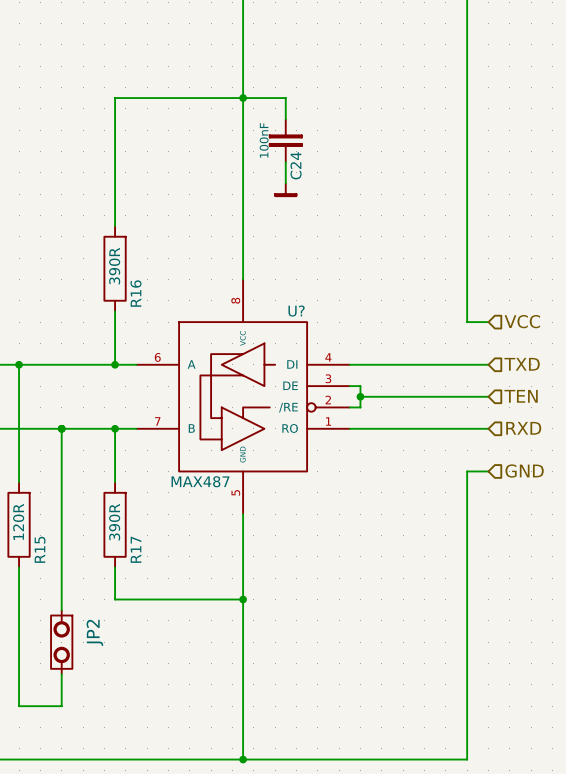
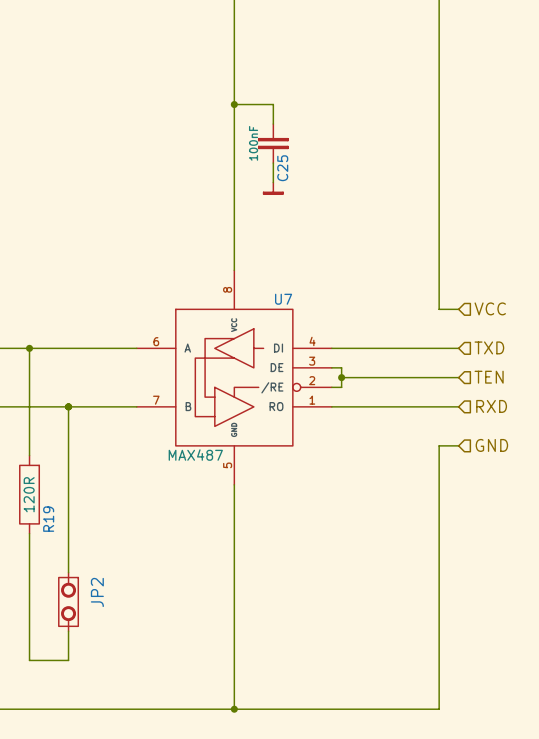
wire: (243, 98) (115, 98) (115, 226) -> none
C24 name: C24 (296, 165) -> C25 (282, 168)
R16: 390R (115, 268) -> none
wire: (115, 311) (115, 364) -> none
U? name: U? (296, 311) -> U7 (283, 299)
junction: (115, 364) -> none
wire: (115, 428) (115, 482) -> none
junction: (115, 428) -> none
R17: 390R (115, 524) -> none
R15 name: R15 (40, 549) -> R19 (48, 519)
wire: (115, 567) (115, 599) (243, 599) -> none
junction: (243, 599) -> none

